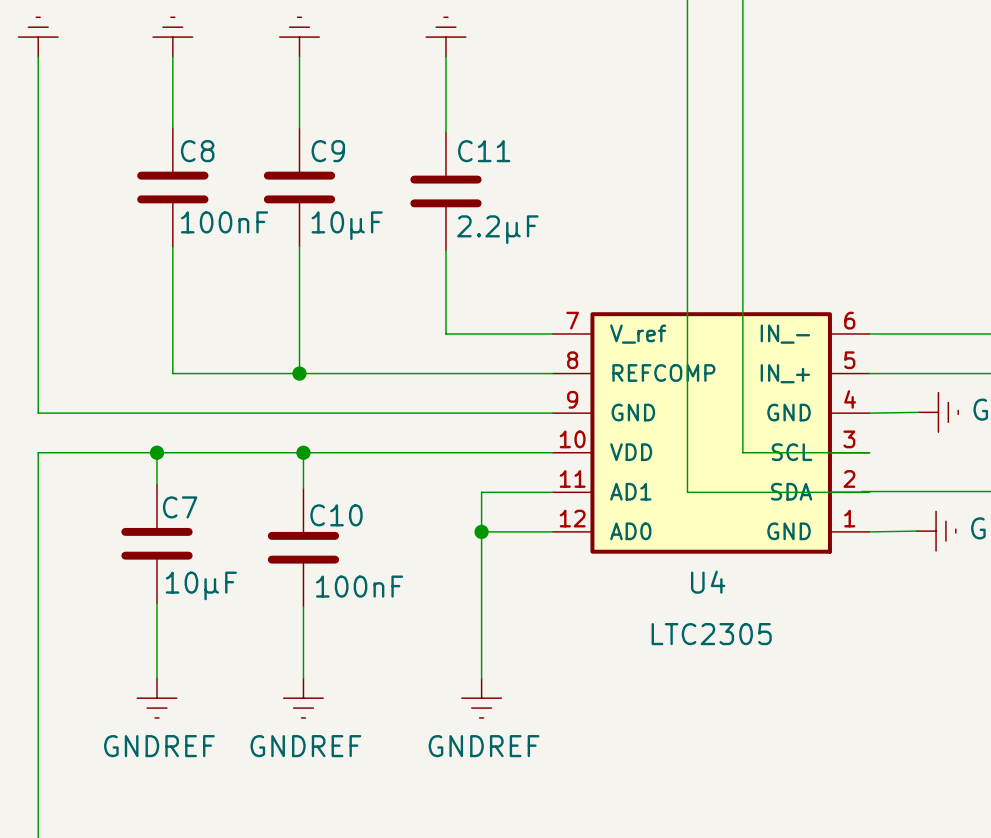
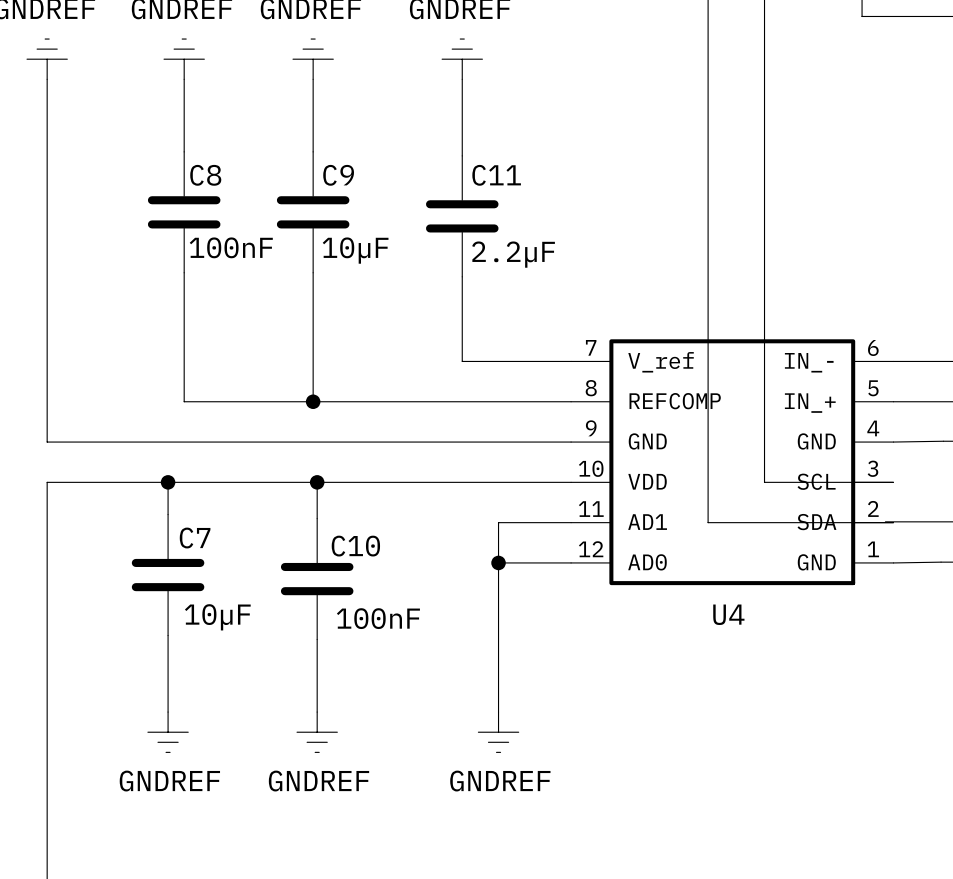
U4 value: LTC2305 (711, 634) -> none

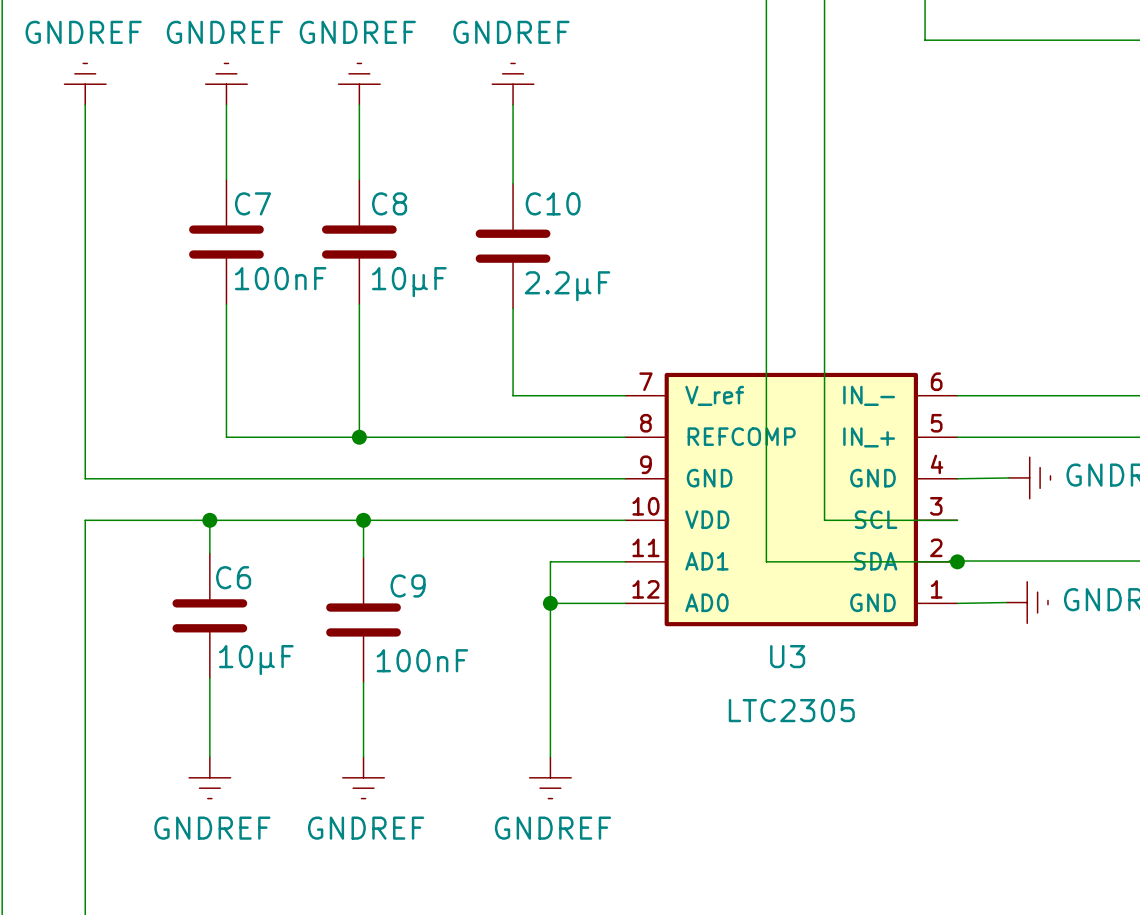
C8 name: C8 (205, 175) -> C7 (253, 203)
C9 name: C9 (338, 175) -> C8 (389, 203)
C11 name: C11 (496, 175) -> C10 (553, 203)
junction: none -> (957, 561)
C7 name: C7 (195, 538) -> C6 (233, 577)
C10 name: C10 (355, 546) -> C9 (408, 585)
U4 name: U4 (728, 614) -> U3 (787, 656)
U4 value: none -> LTC2305 (791, 710)

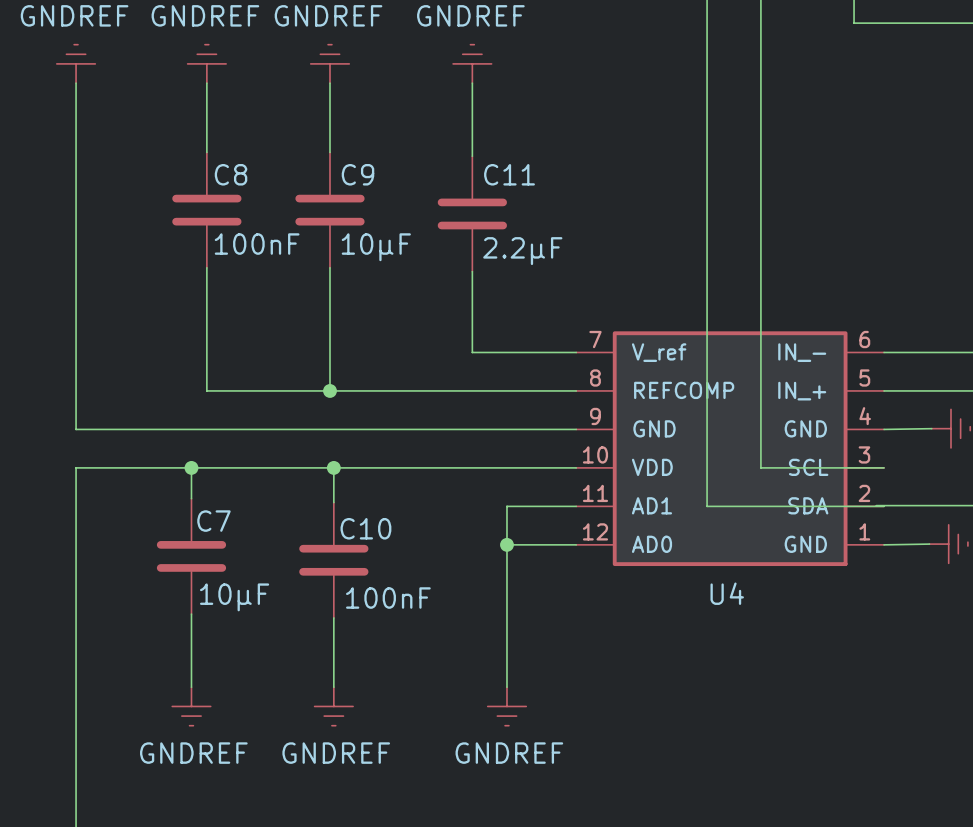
C7 name: C7 (253, 203) -> C8 (231, 174)
C8 name: C8 (389, 203) -> C9 (357, 174)
C10 name: C10 (553, 203) -> C11 (509, 174)
junction: (957, 561) -> none
C6 name: C6 (233, 577) -> C7 (213, 521)
C9 name: C9 (408, 585) -> C10 (365, 528)
U3 name: U3 (787, 656) -> U4 (727, 593)
U3 value: LTC2305 (791, 710) -> none

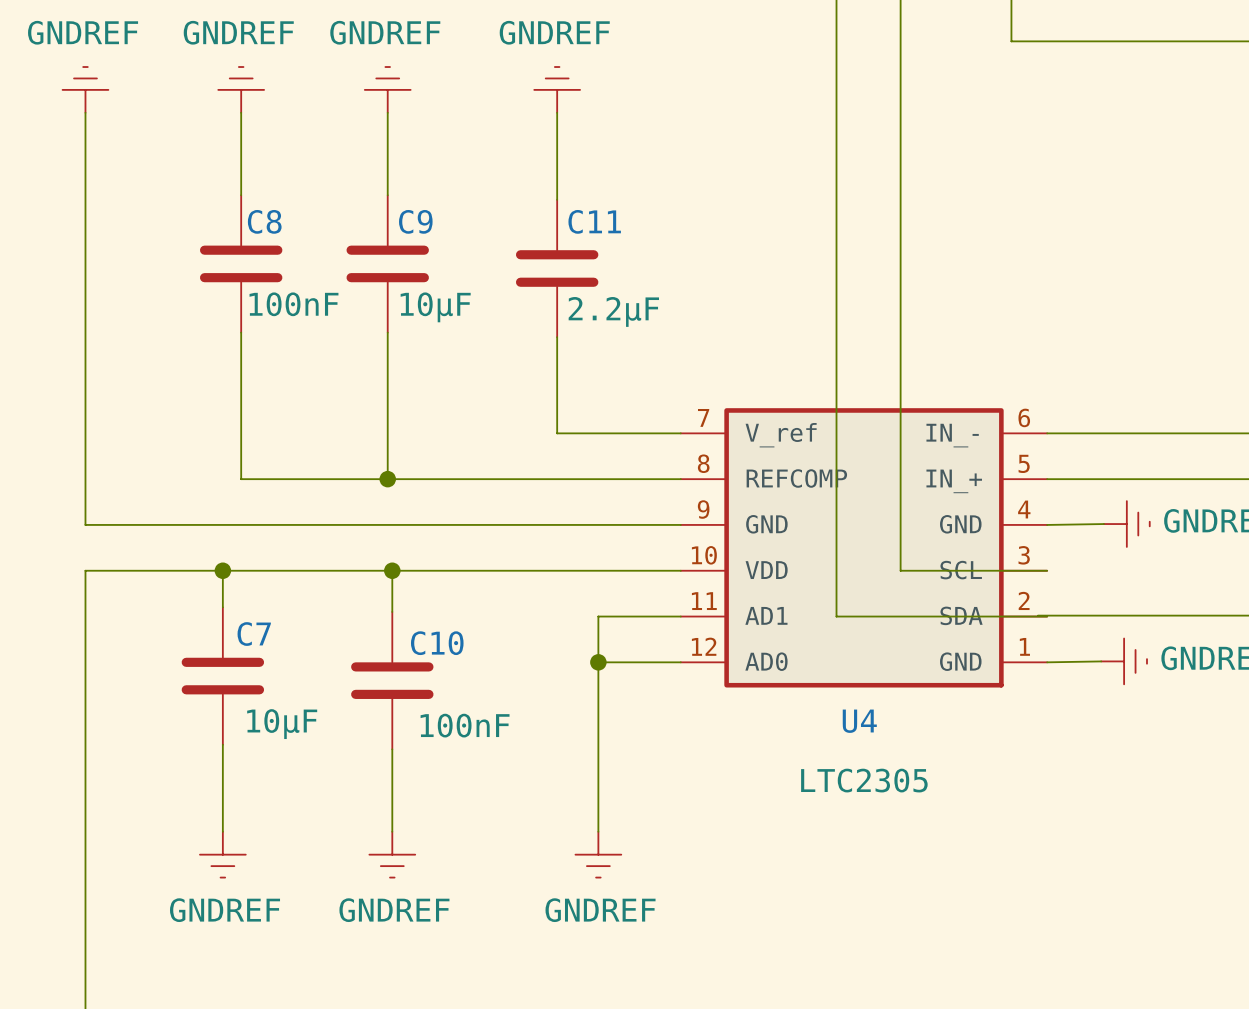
U4 value: none -> LTC2305 (864, 780)

